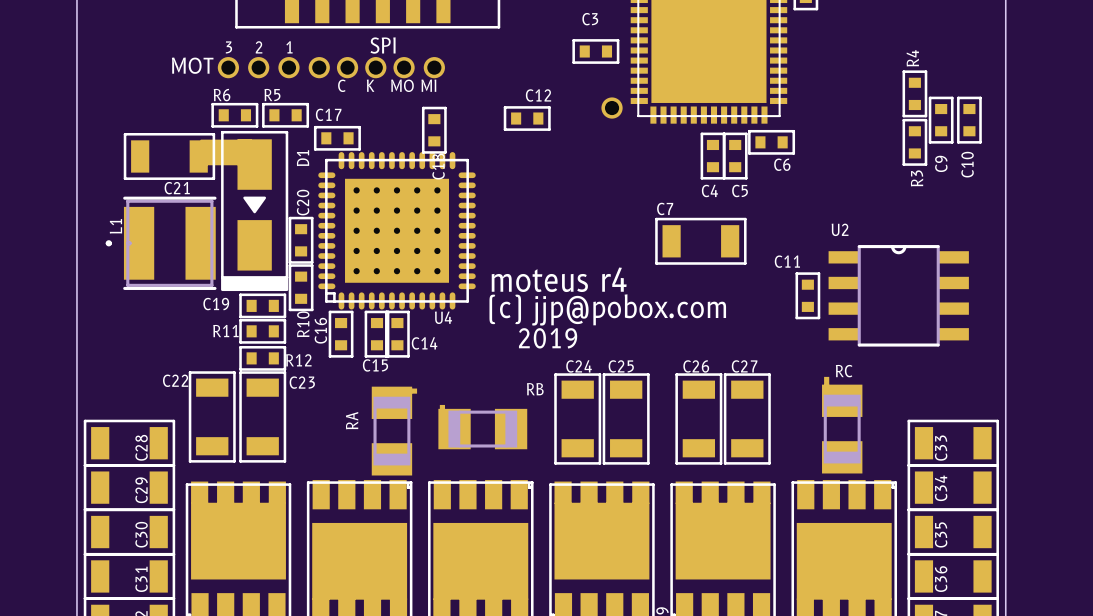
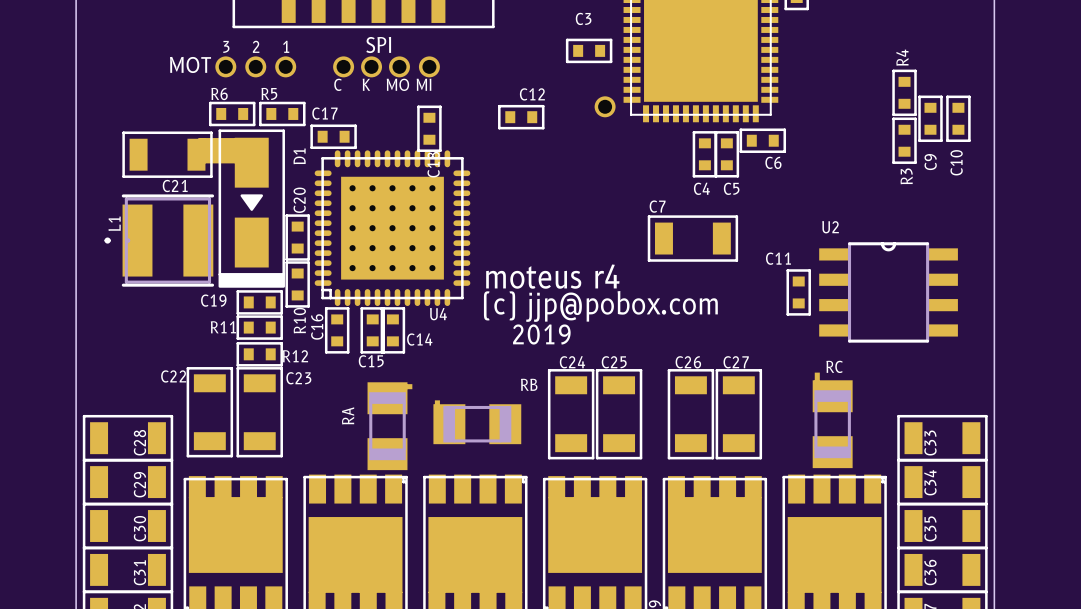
part: (319, 67) -> none

